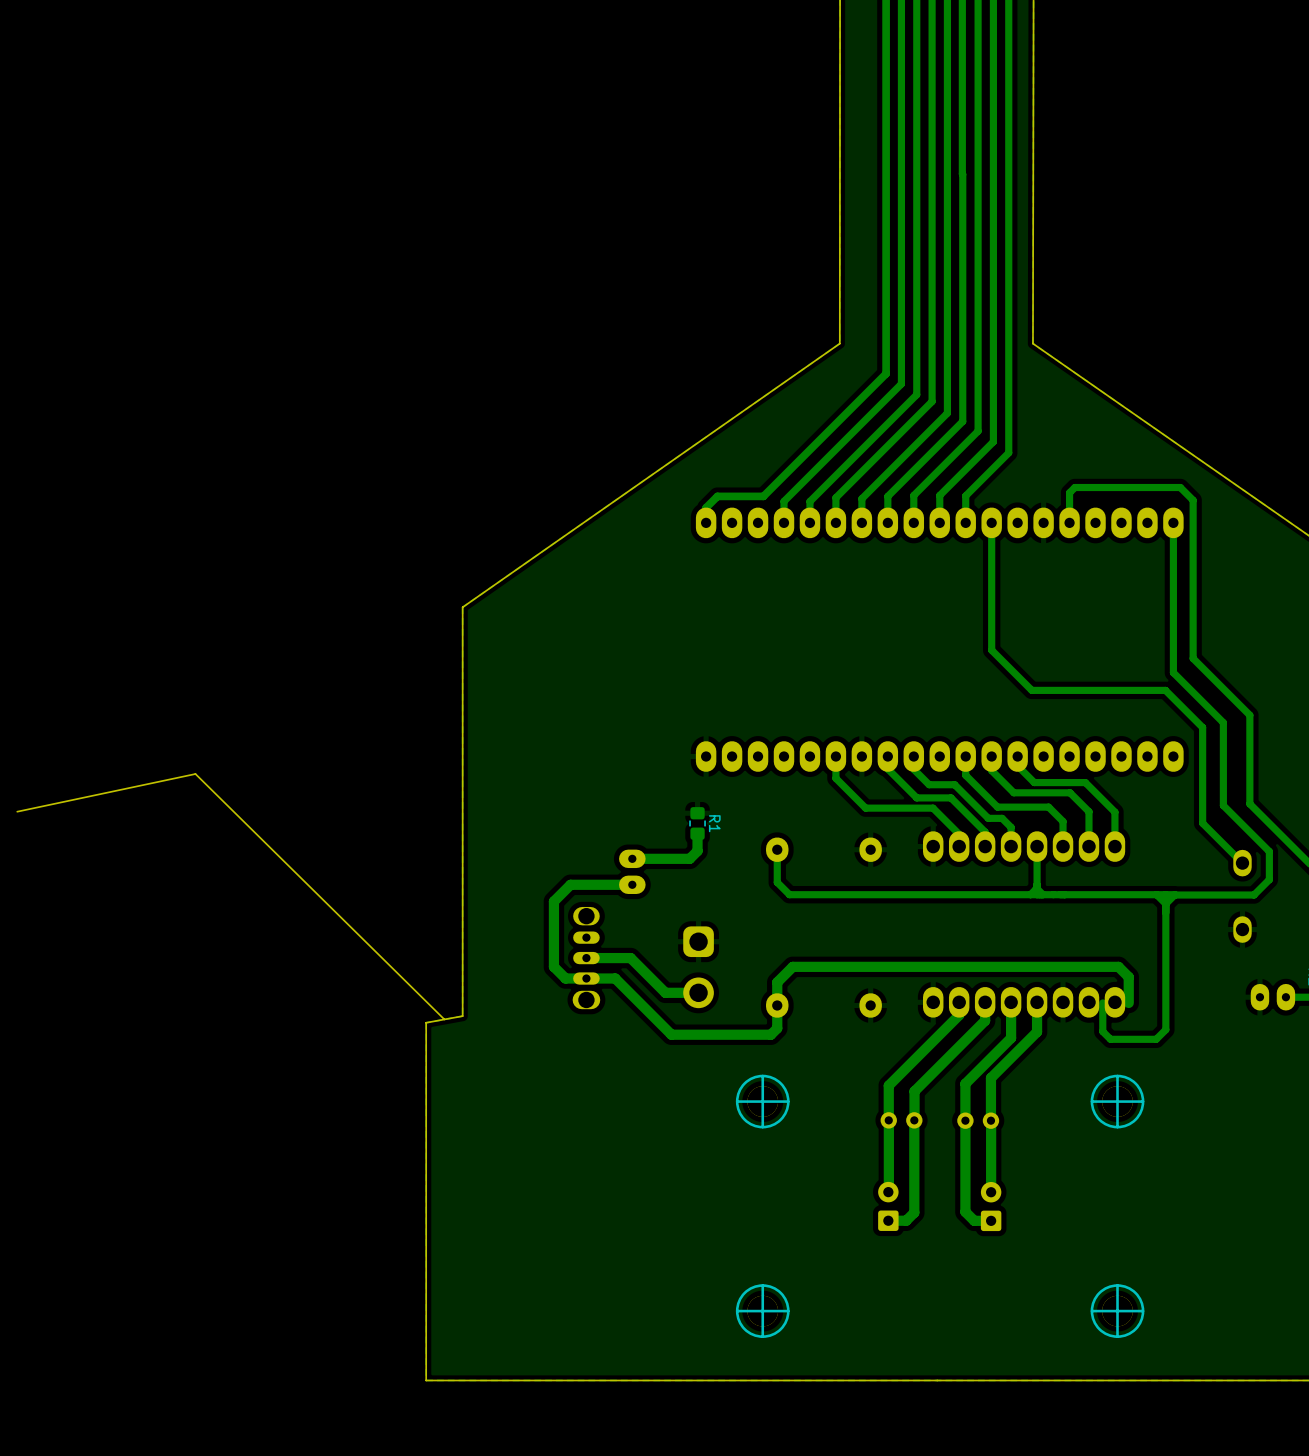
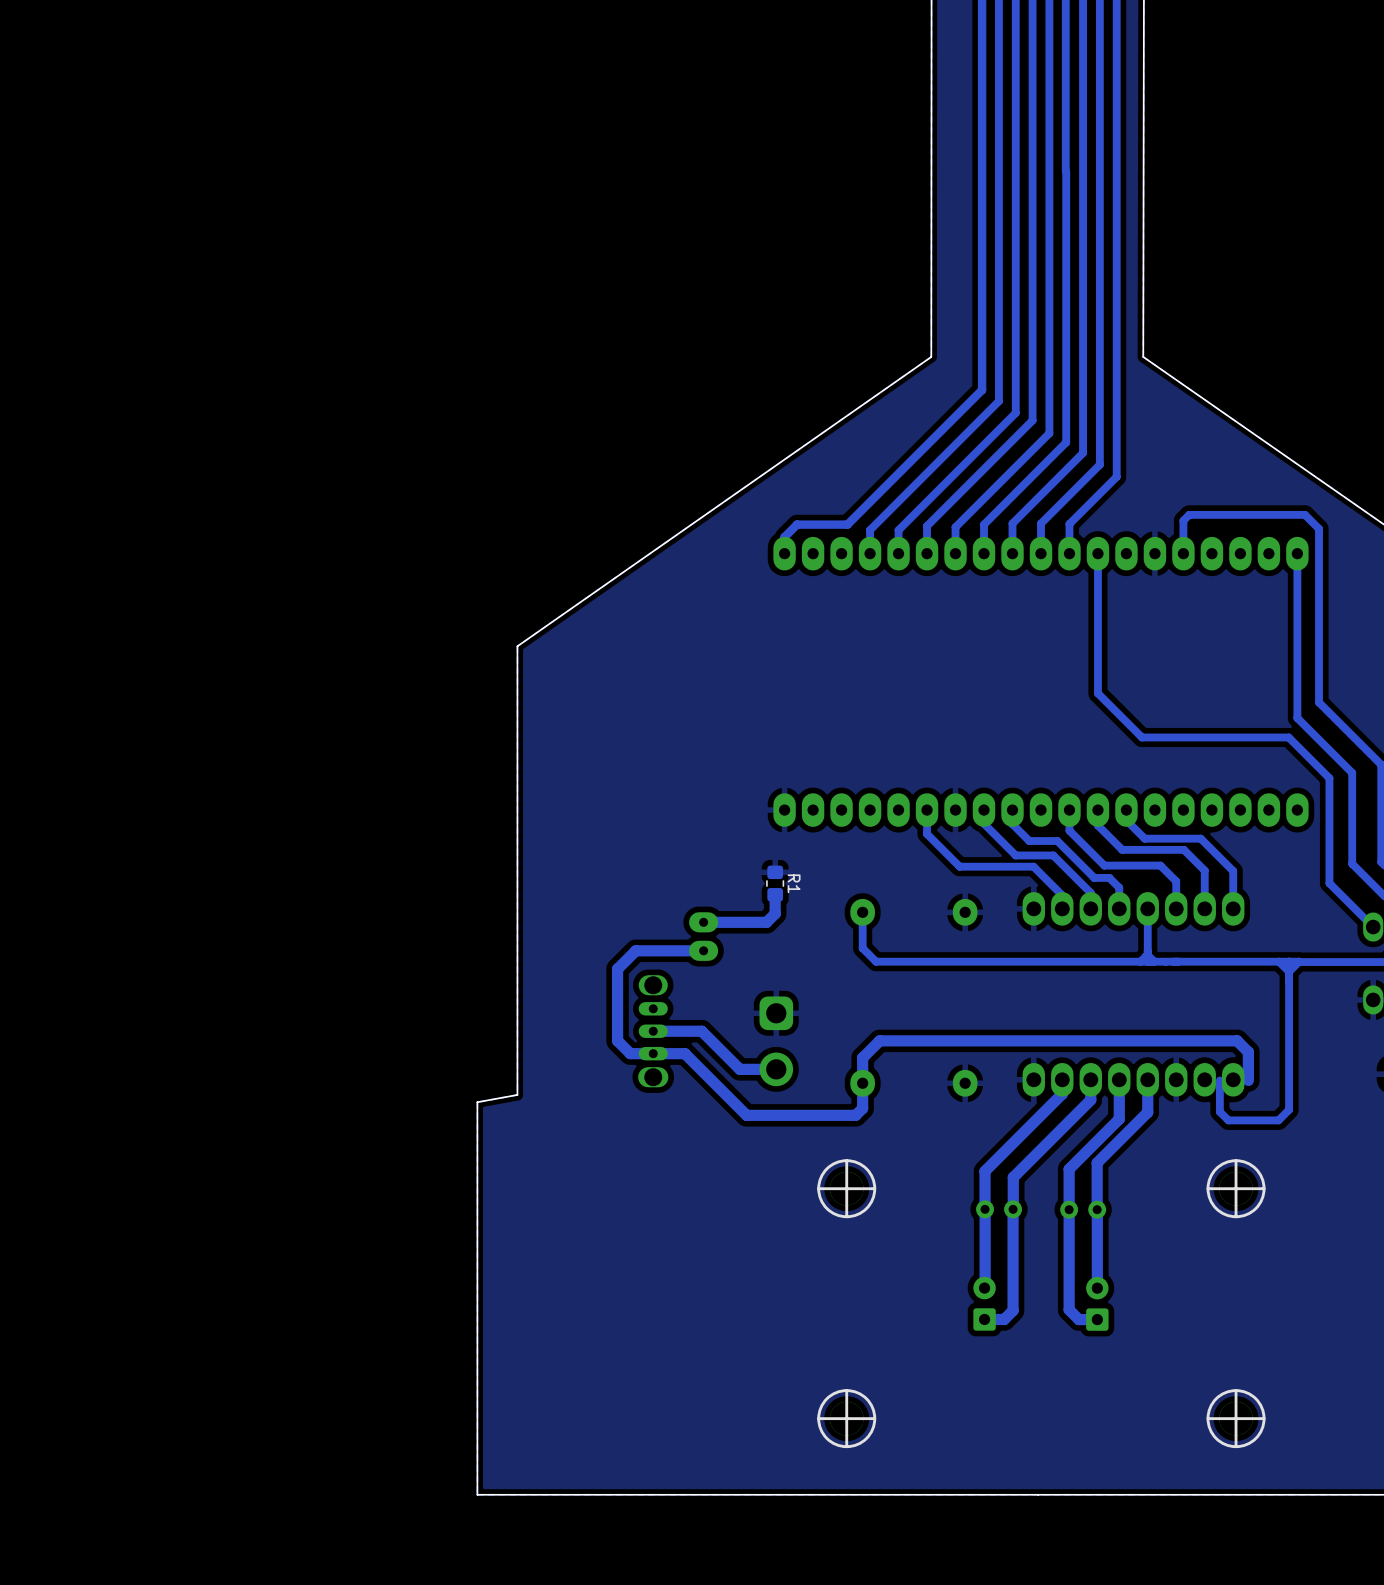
board edge: (17, 811) (195, 773) (444, 1019) -> none

